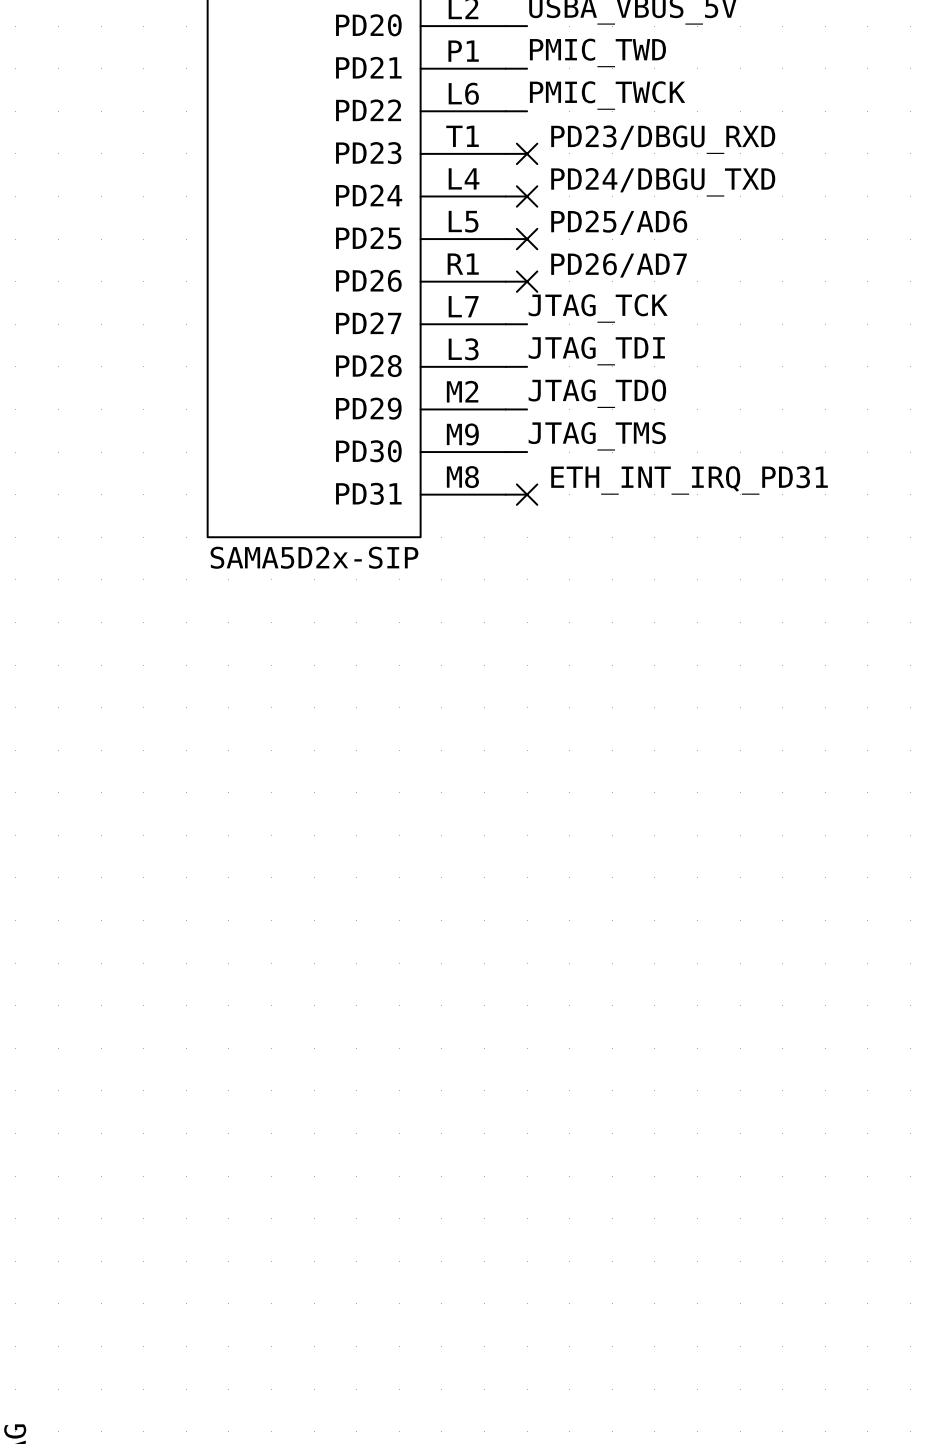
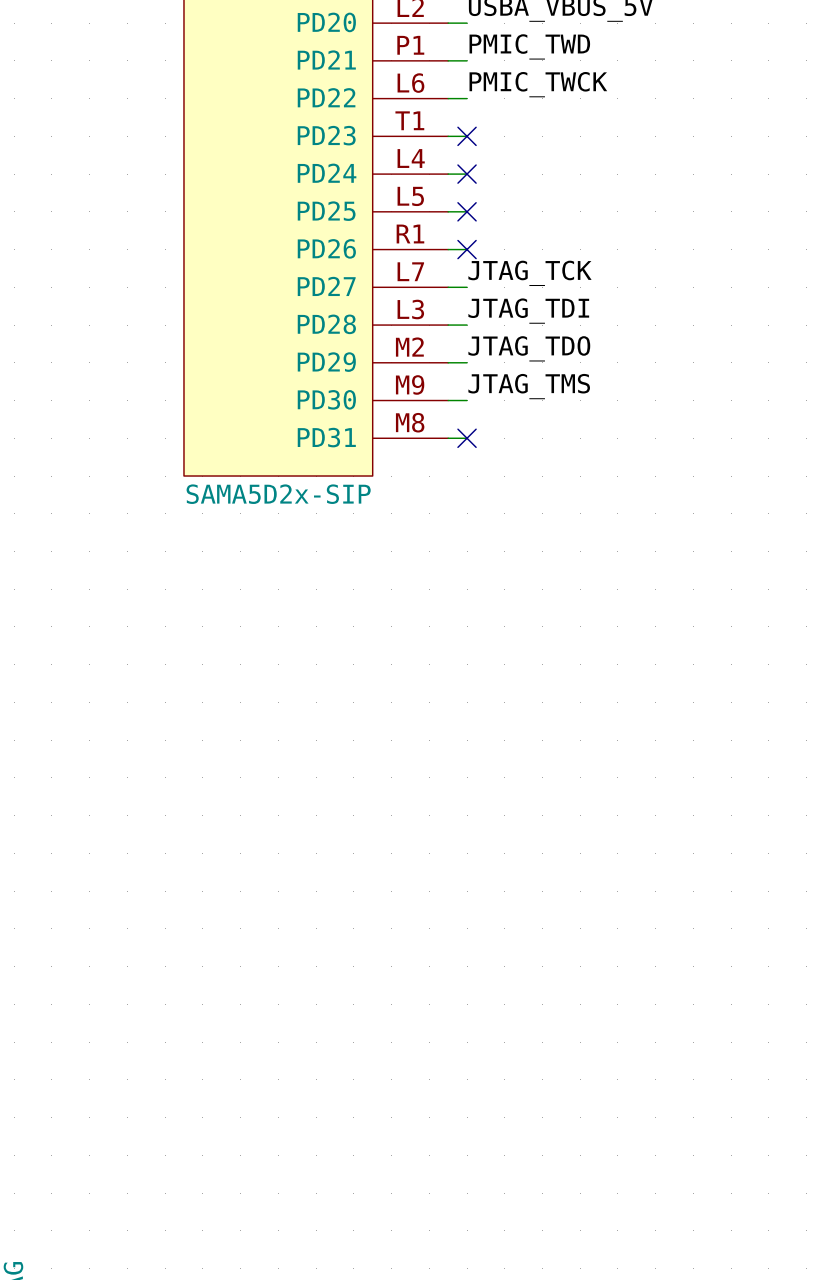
text: PD23/DBGU_RXD (663, 139) -> none
text: PD24/DBGU_TXD (663, 182) -> none
text: PD25/AD6 (619, 222) -> none
text: PD26/AD7 (619, 265) -> none
text: ETH_INT_IRQ_PD31 (689, 480) -> none

